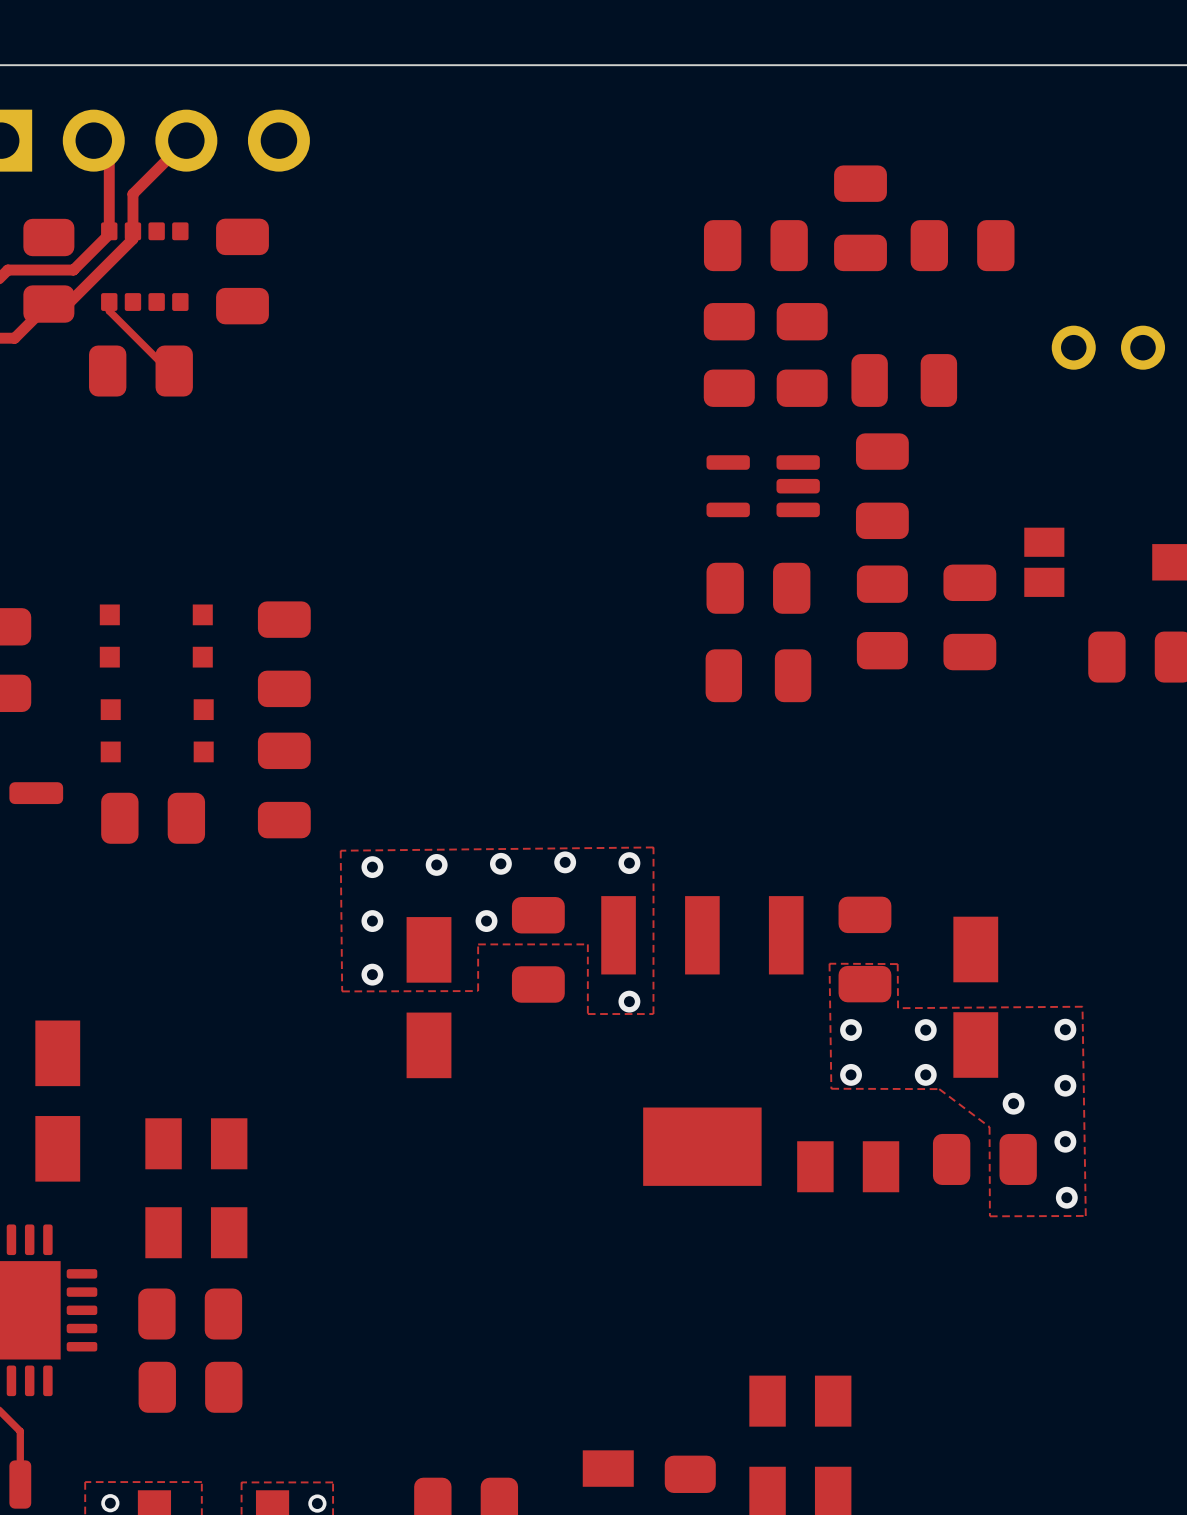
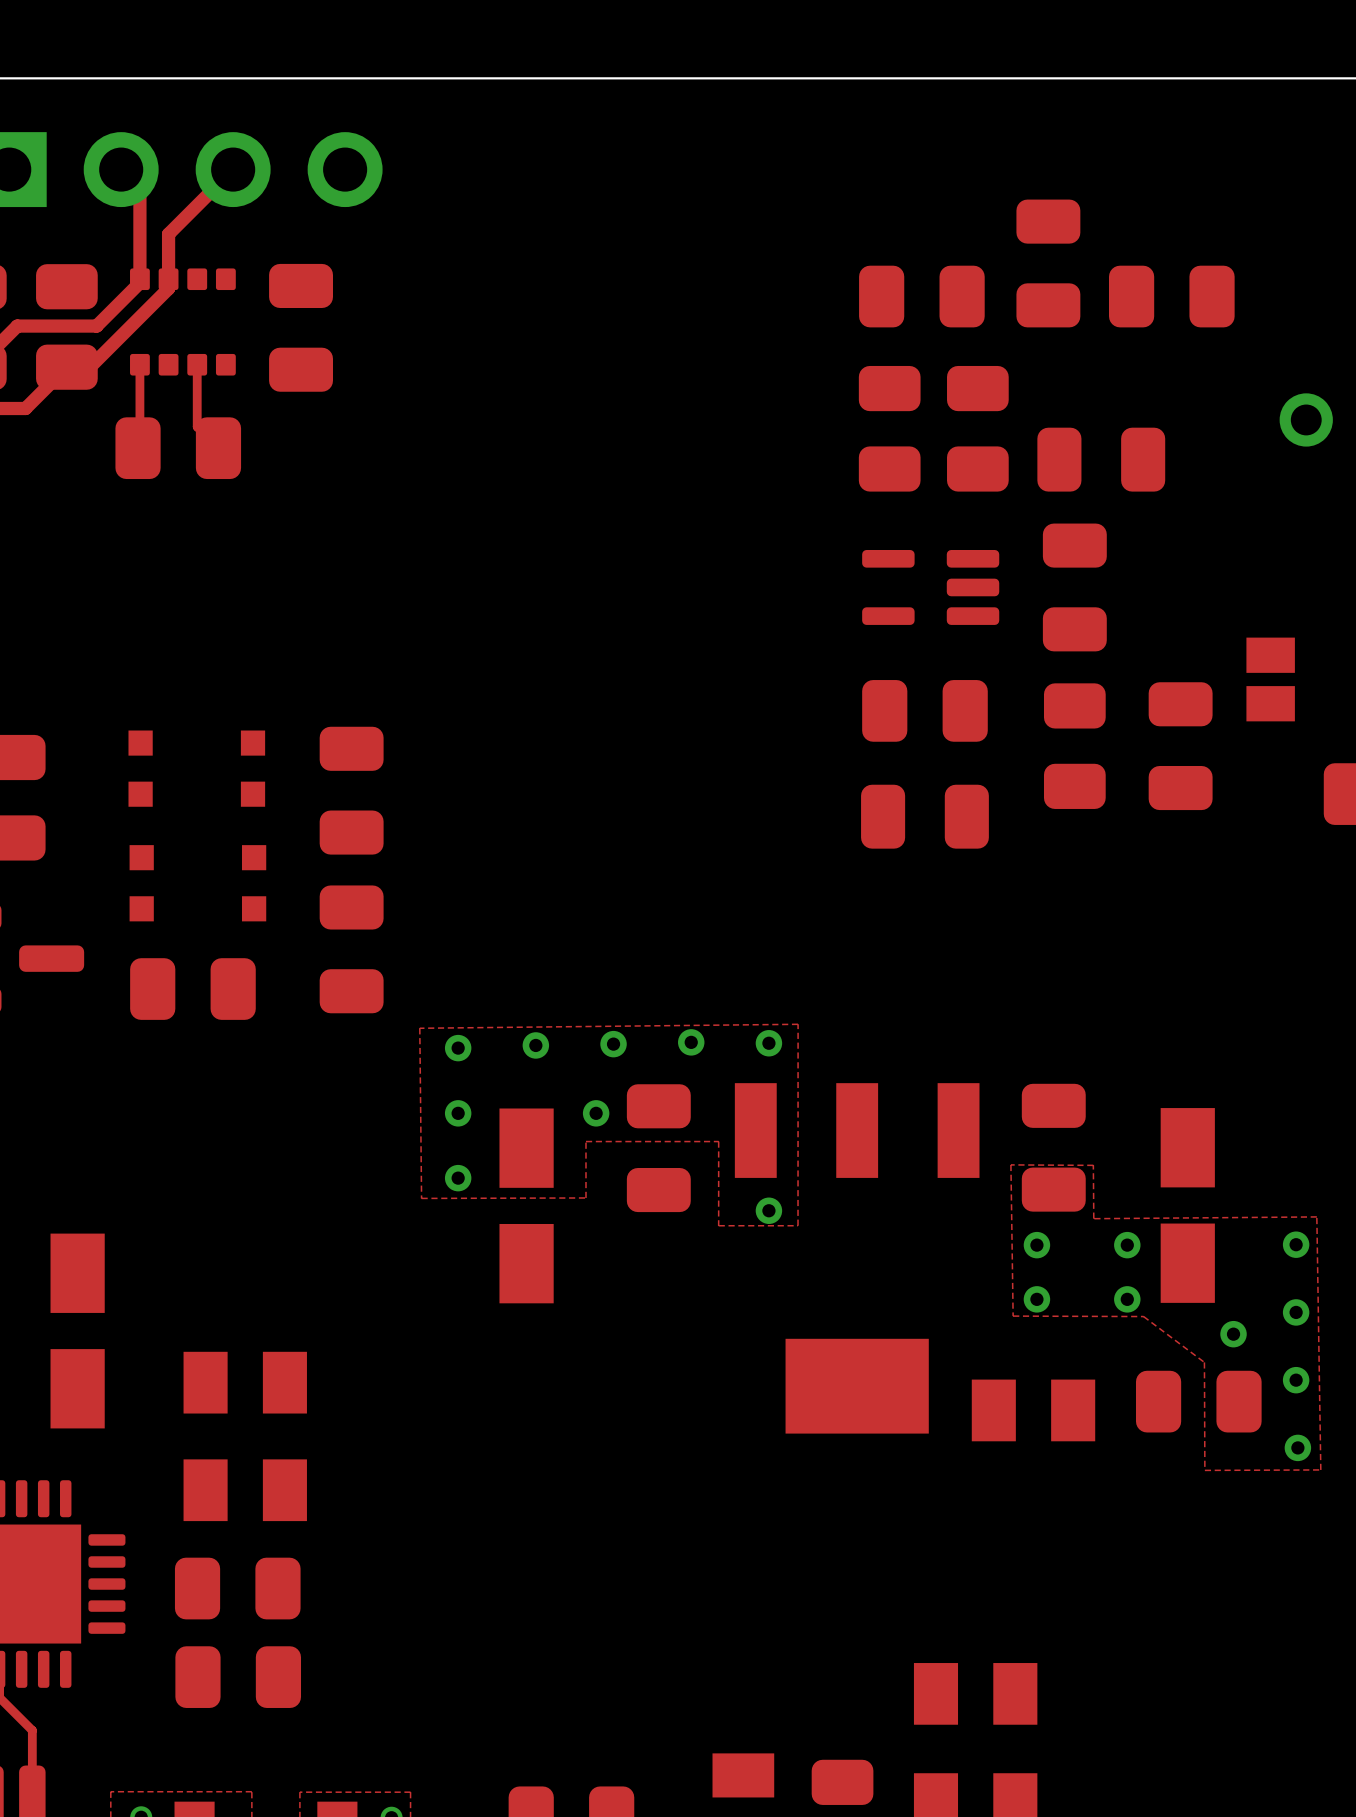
top track: none -> (197, 364) (197, 426) (218, 448)
top track: (109, 310) (169, 371) -> (139, 375) (139, 446) (138, 448)

